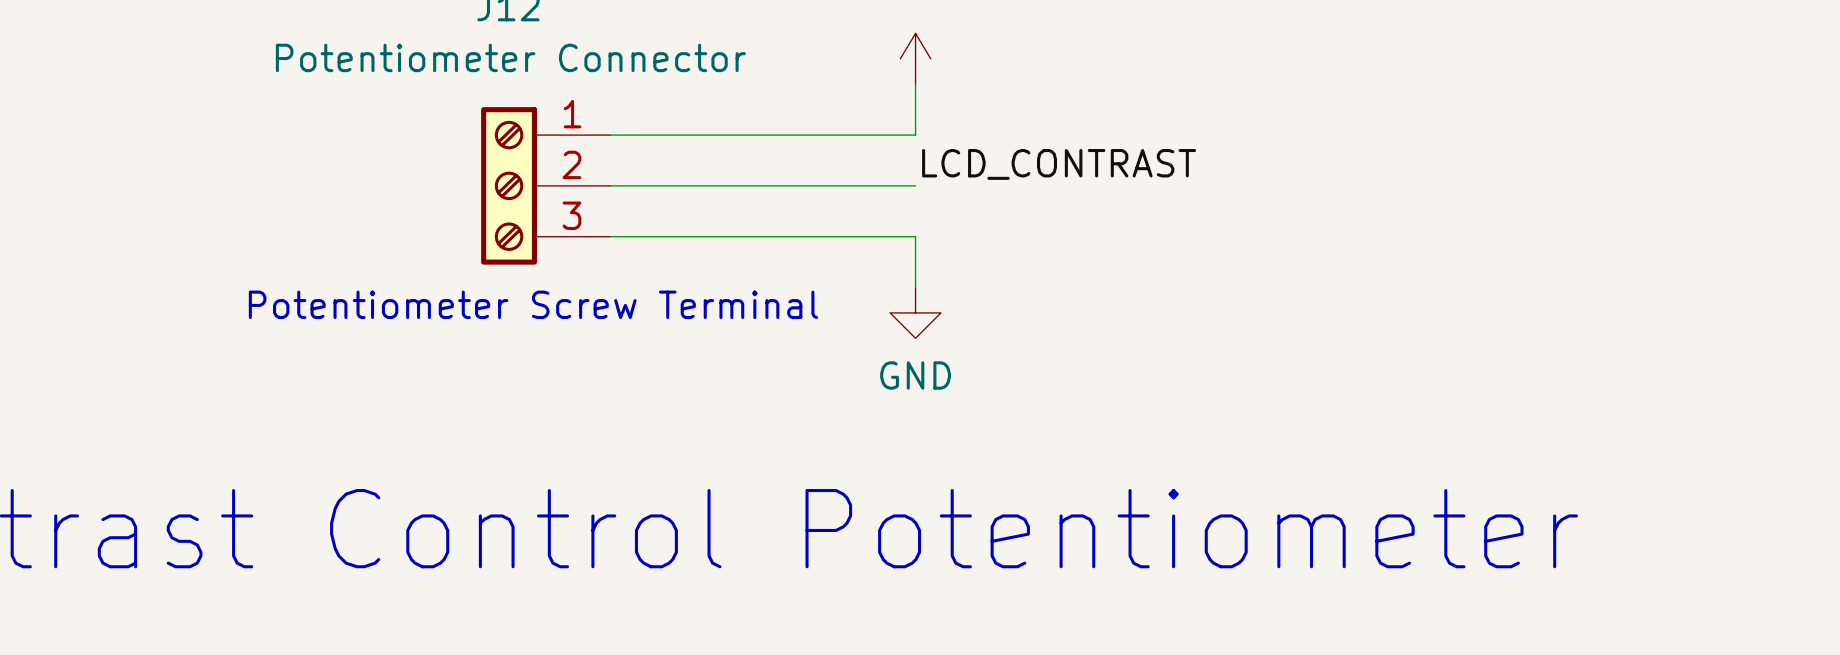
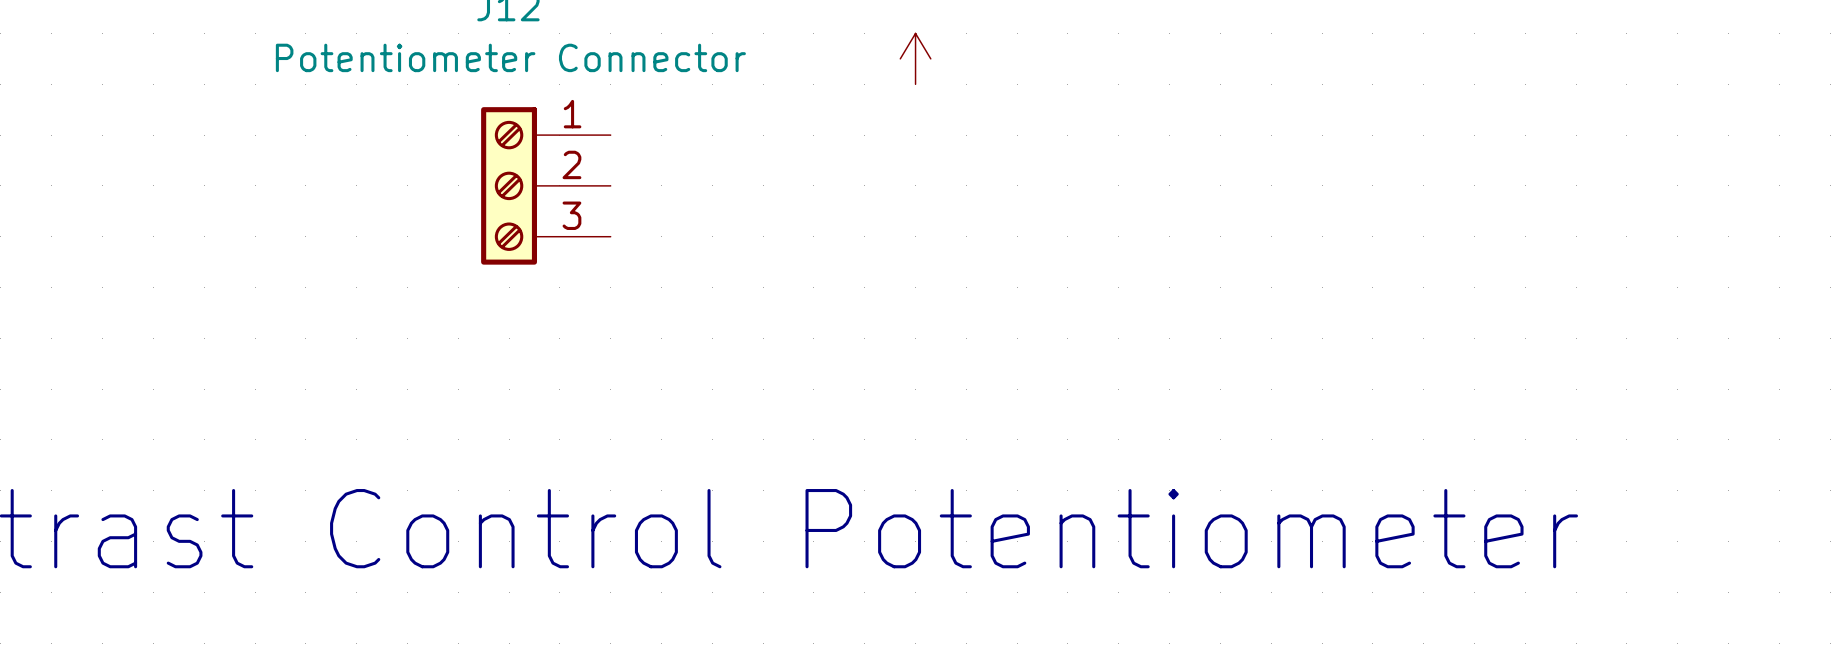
wire: (915, 84) (915, 135) (610, 135) -> none
label: LCD_CONTRAST (1059, 164) -> none
wire: (610, 185) (915, 185) -> none
wire: (610, 236) (915, 236) (915, 287) -> none
text: Potentiometer Screw Terminal (533, 304) -> none
power symbol: GND (915, 312) -> none

